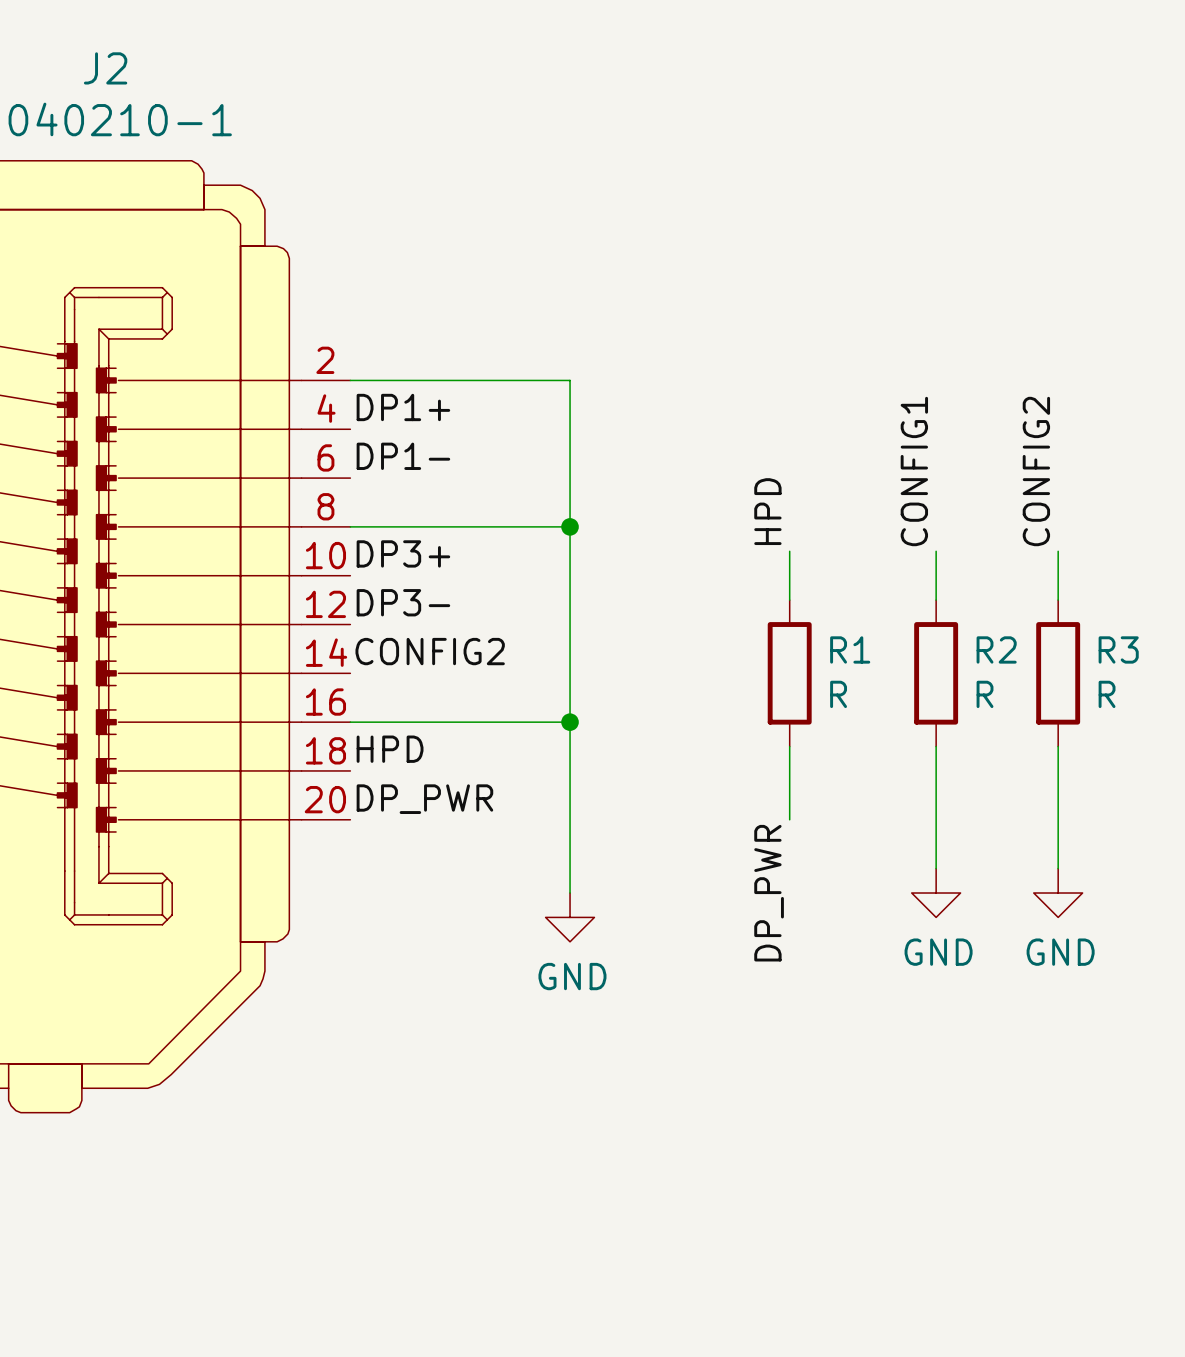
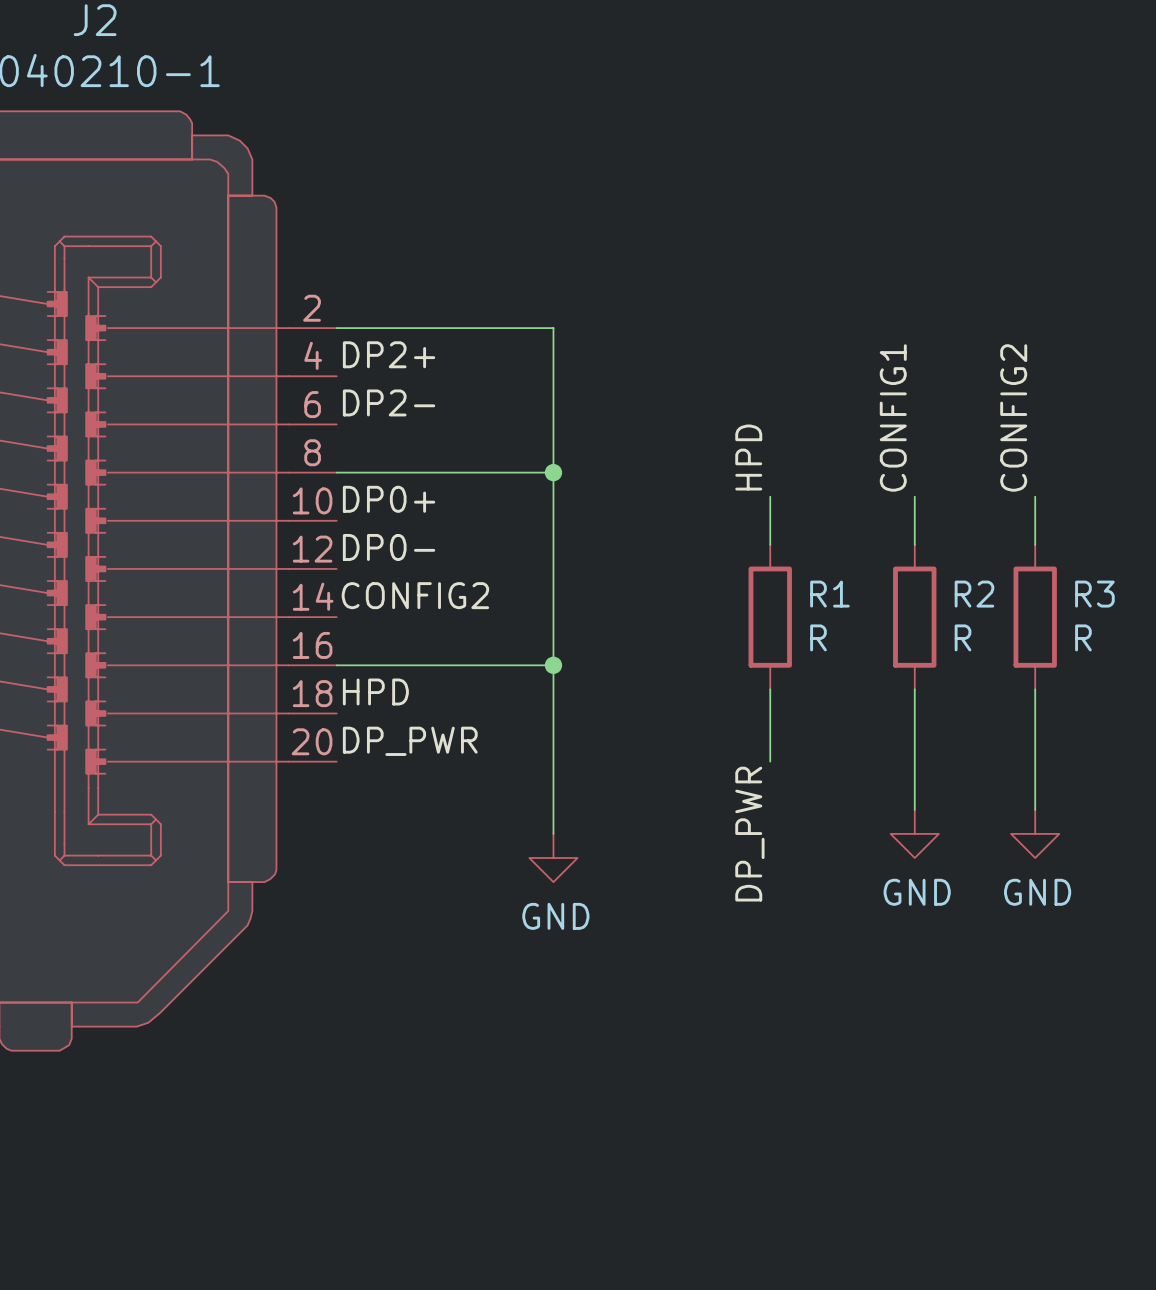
label: DP1+ (403, 407) -> DP2+ (389, 354)
label: DP1- (403, 456) -> DP2- (389, 402)
label: DP3+ (403, 553) -> DP0+ (389, 499)
label: DP3- (403, 602) -> DP0- (389, 547)

